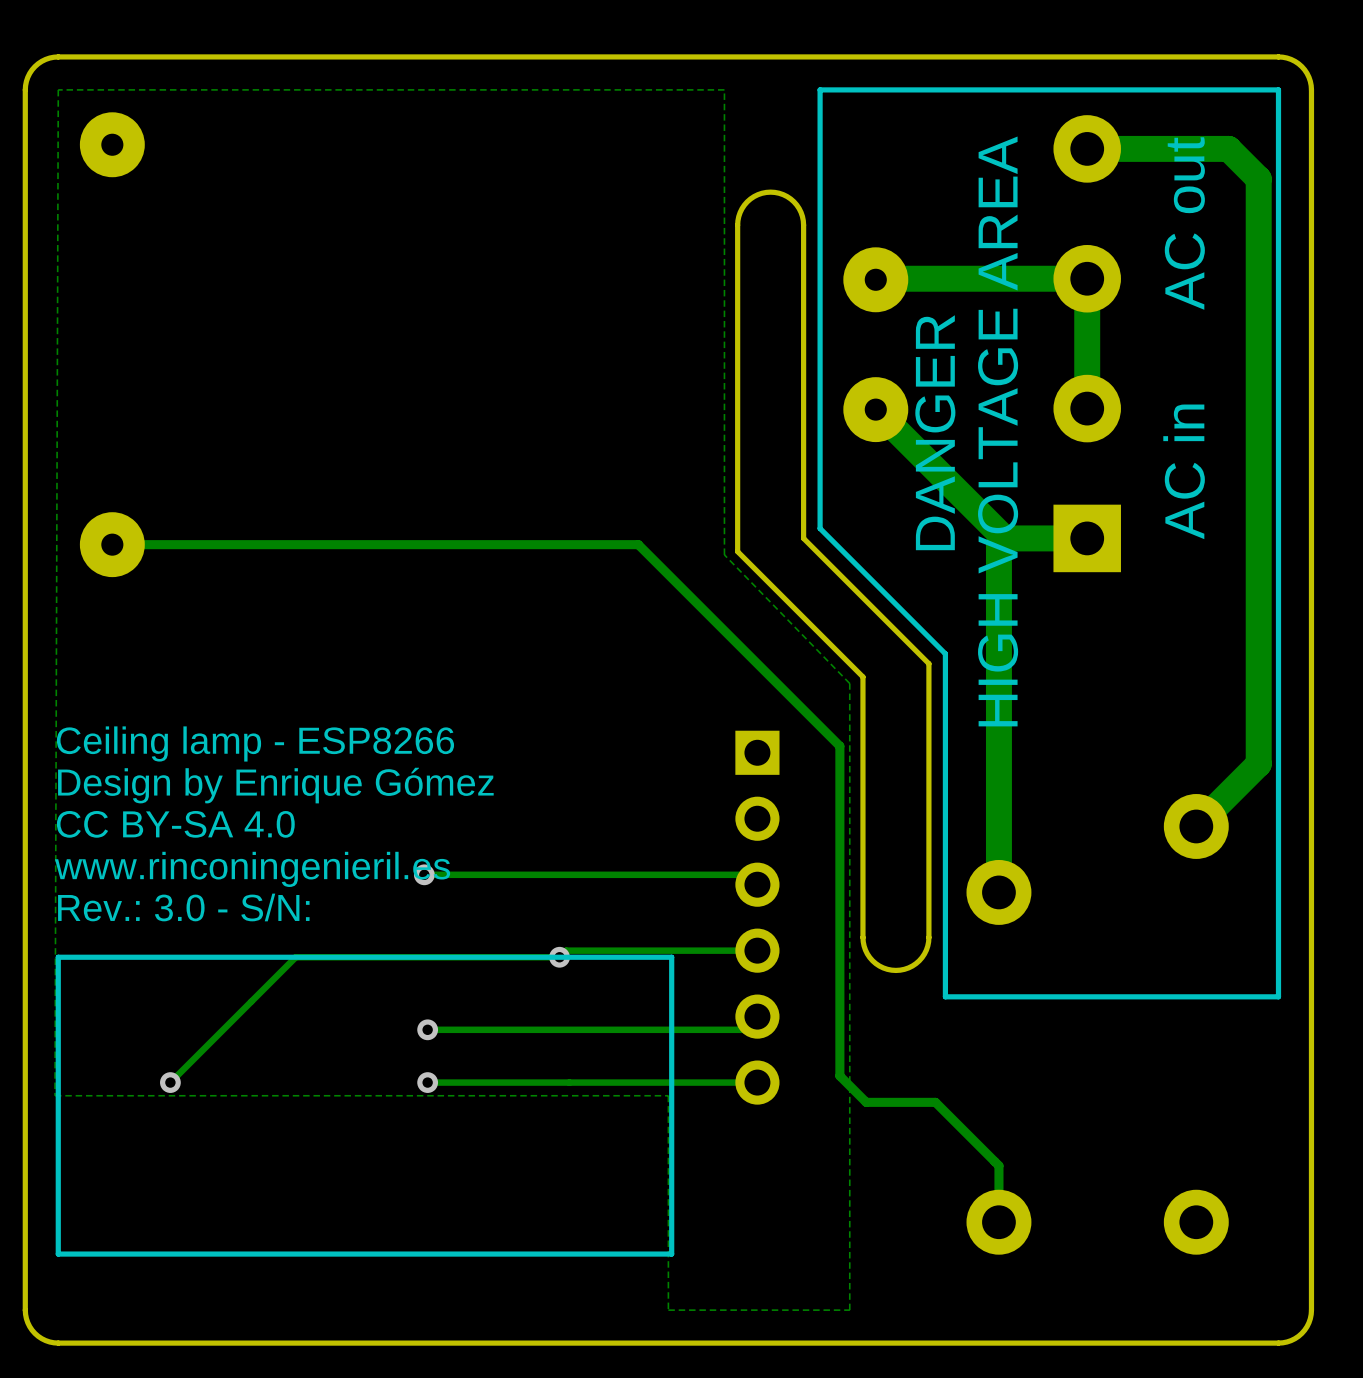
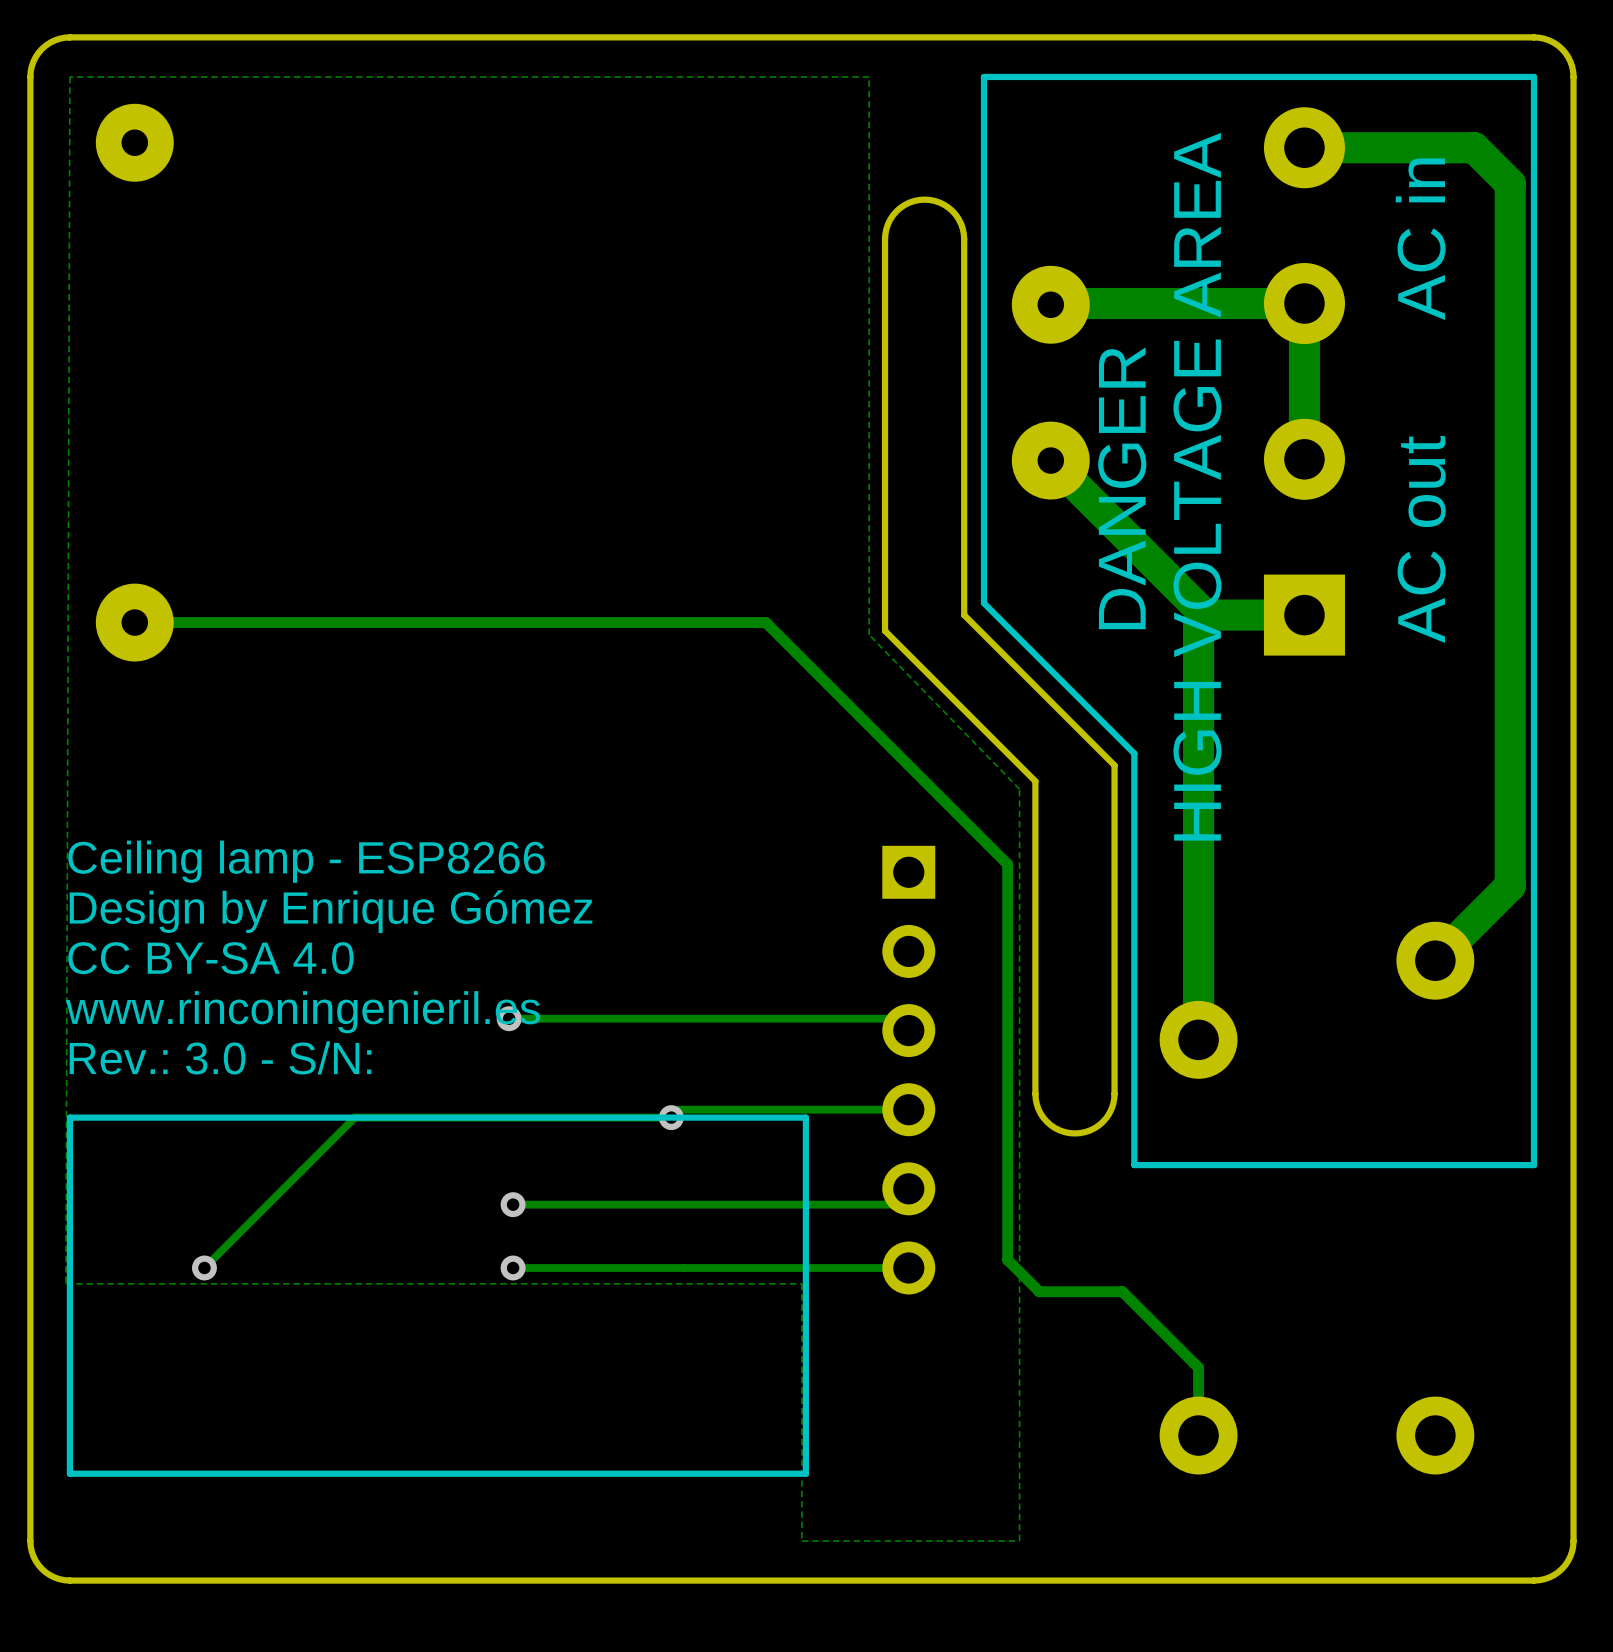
text: AC out (1184, 223) -> AC in (1420, 239)
text: AC in (1184, 471) -> AC out (1421, 539)

